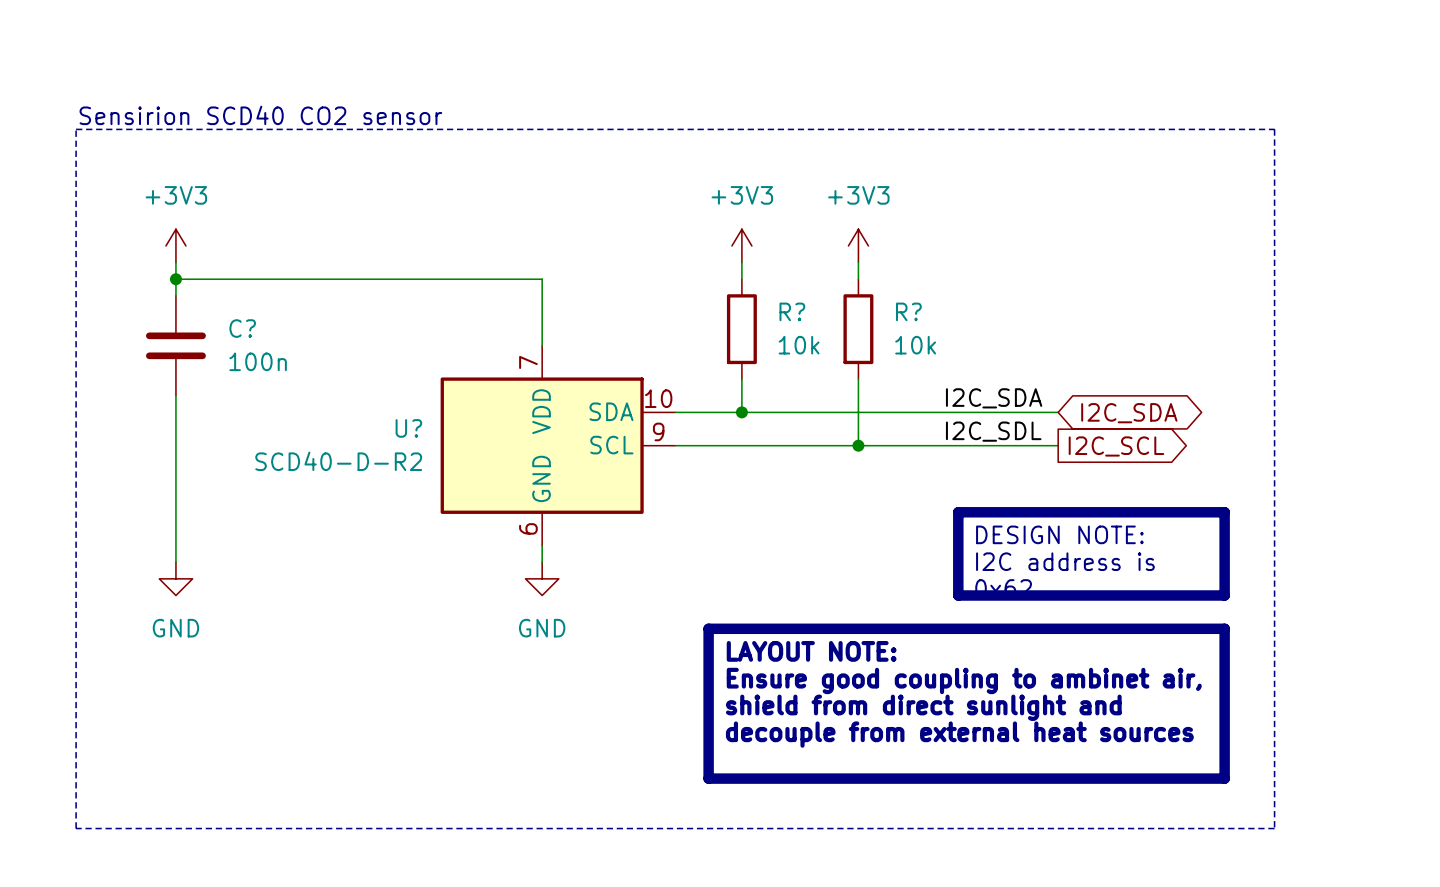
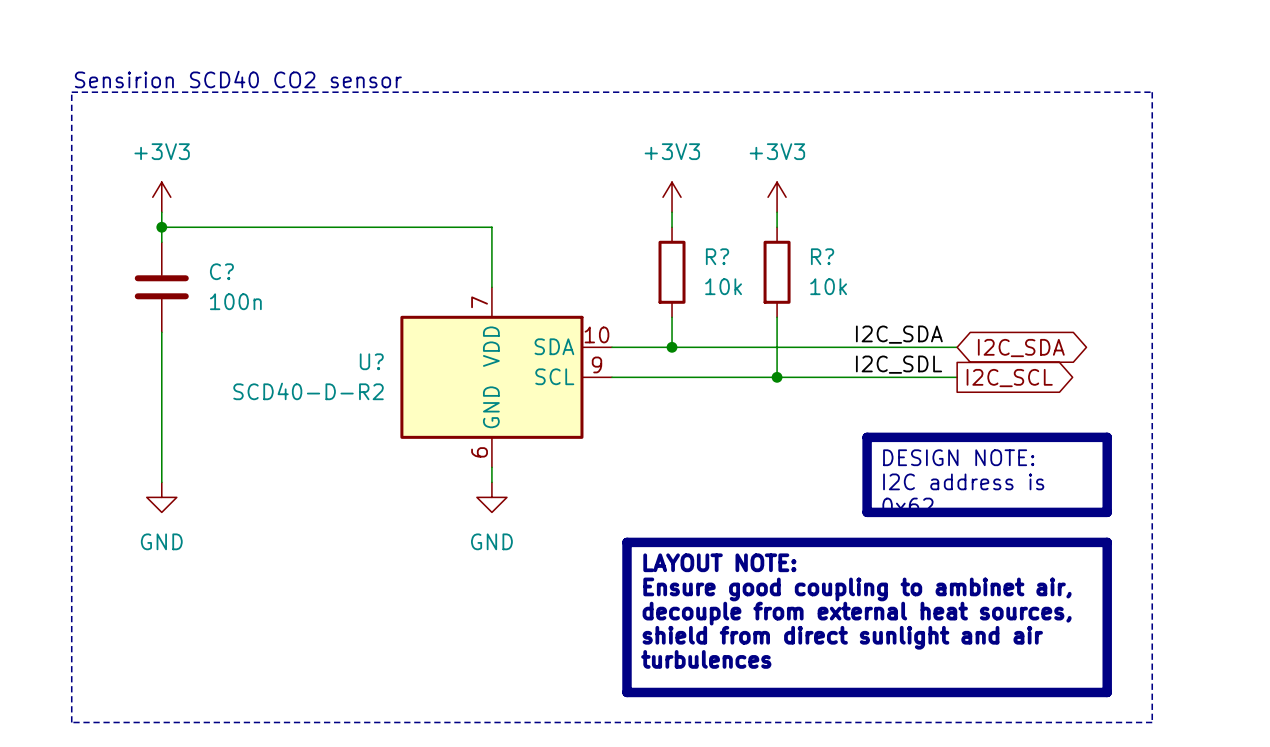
line: (708, 628) (708, 778) (1224, 778) -> (642, 542) (626, 542) (626, 692) (1107, 692) (1107, 677)
text position: LAYOUT NOTE: (811, 651) -> LAYOUT NOTE: (719, 562)
text position: Ensure good coupling to ambinet air, (964, 680) -> Ensure good coupling to ambinet air, (857, 589)
text: shield from direct sunlight and (923, 707) -> shield from direct sunlight and air (842, 637)
text: decouple from external heat sources (959, 734) -> decouple from external heat sources, (857, 613)
text: none -> turbulences (706, 659)

